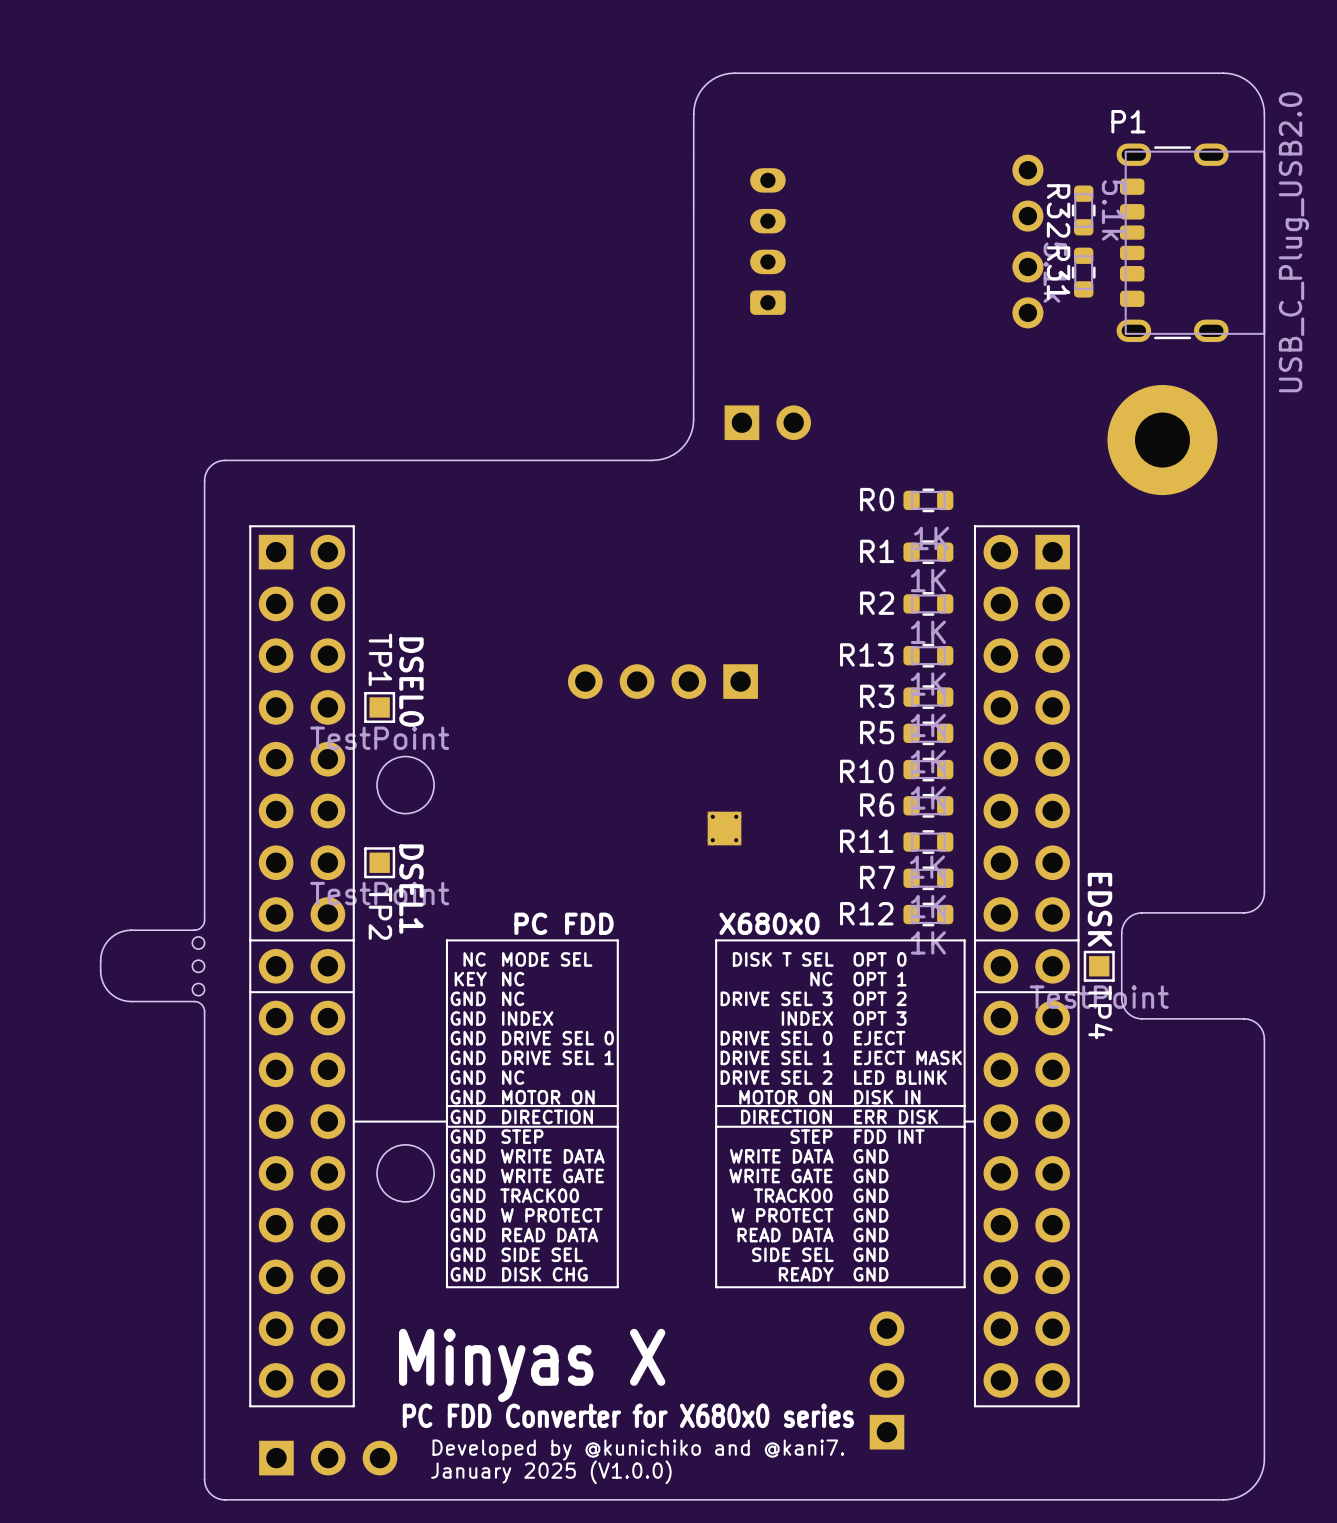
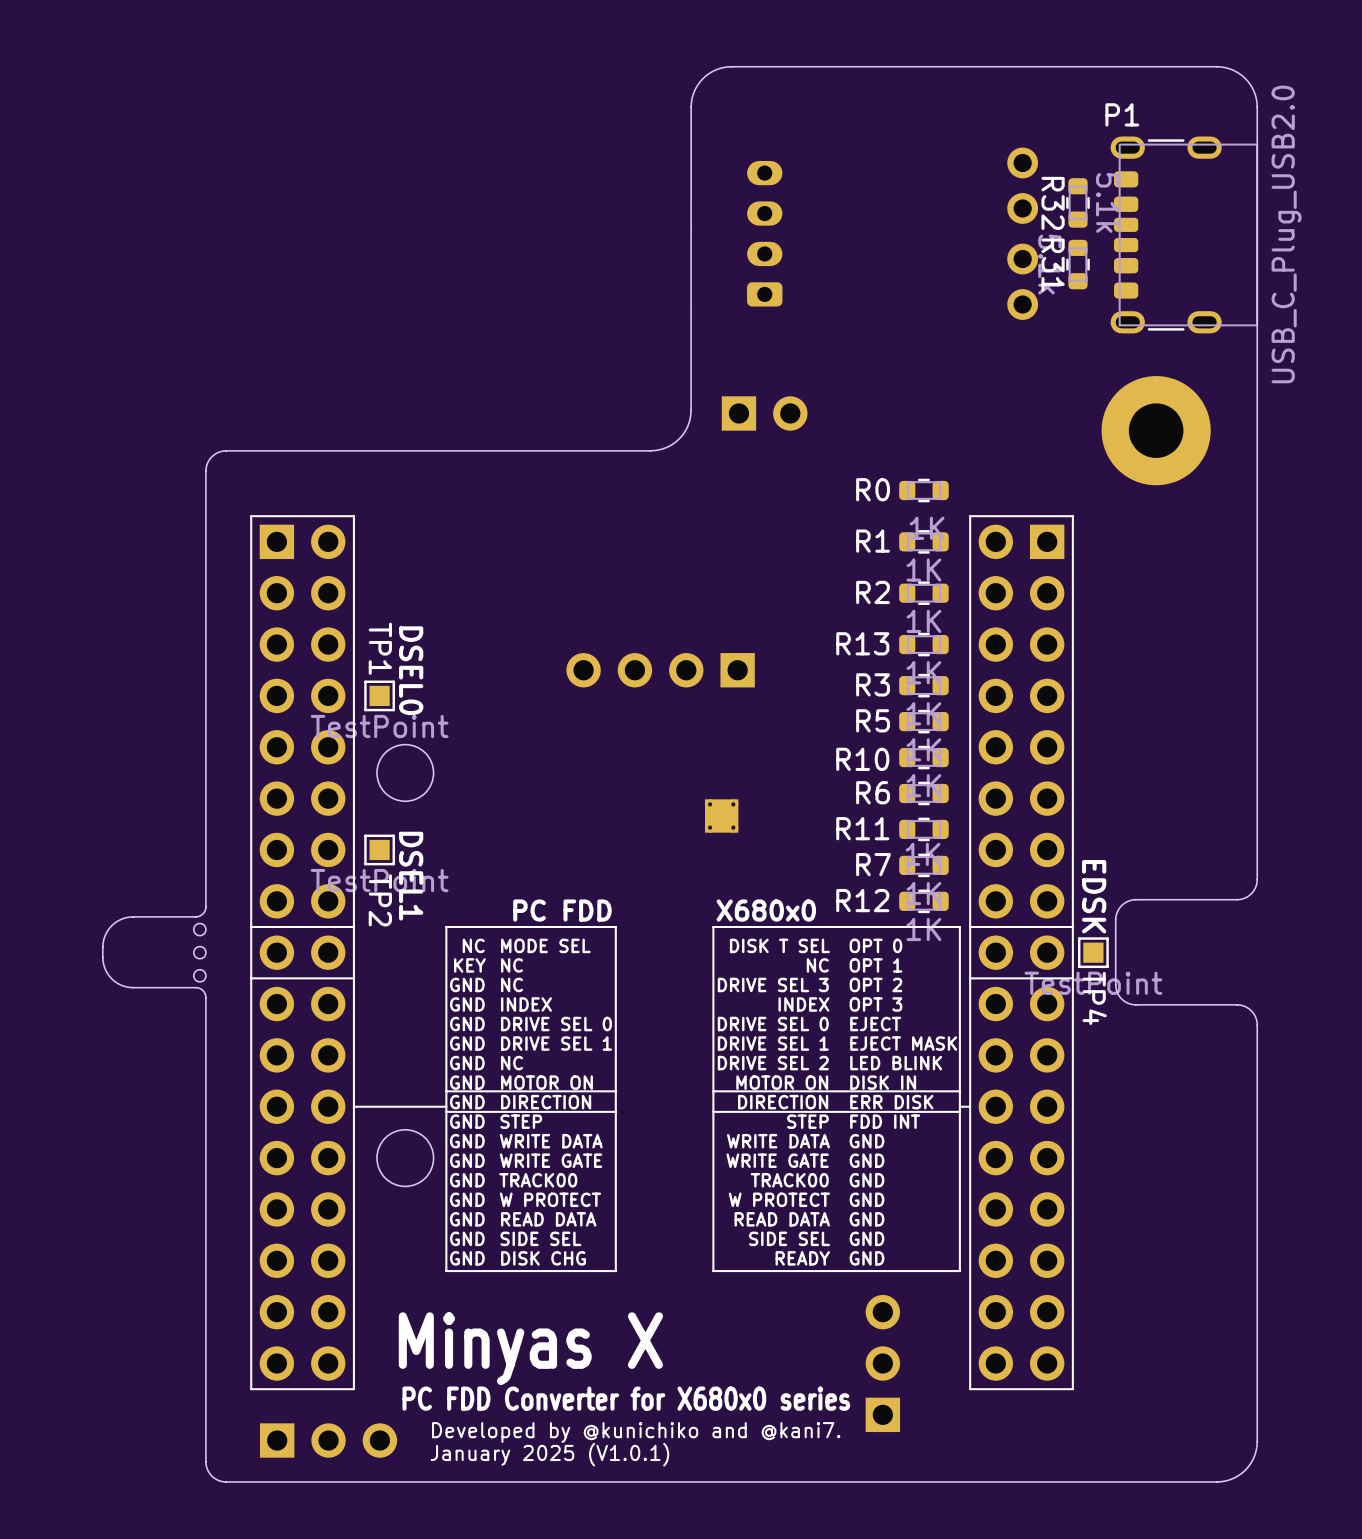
text: January 2025 (V1.0.0) (551, 1472) -> January 2025 (V1.0.1) (549, 1454)

